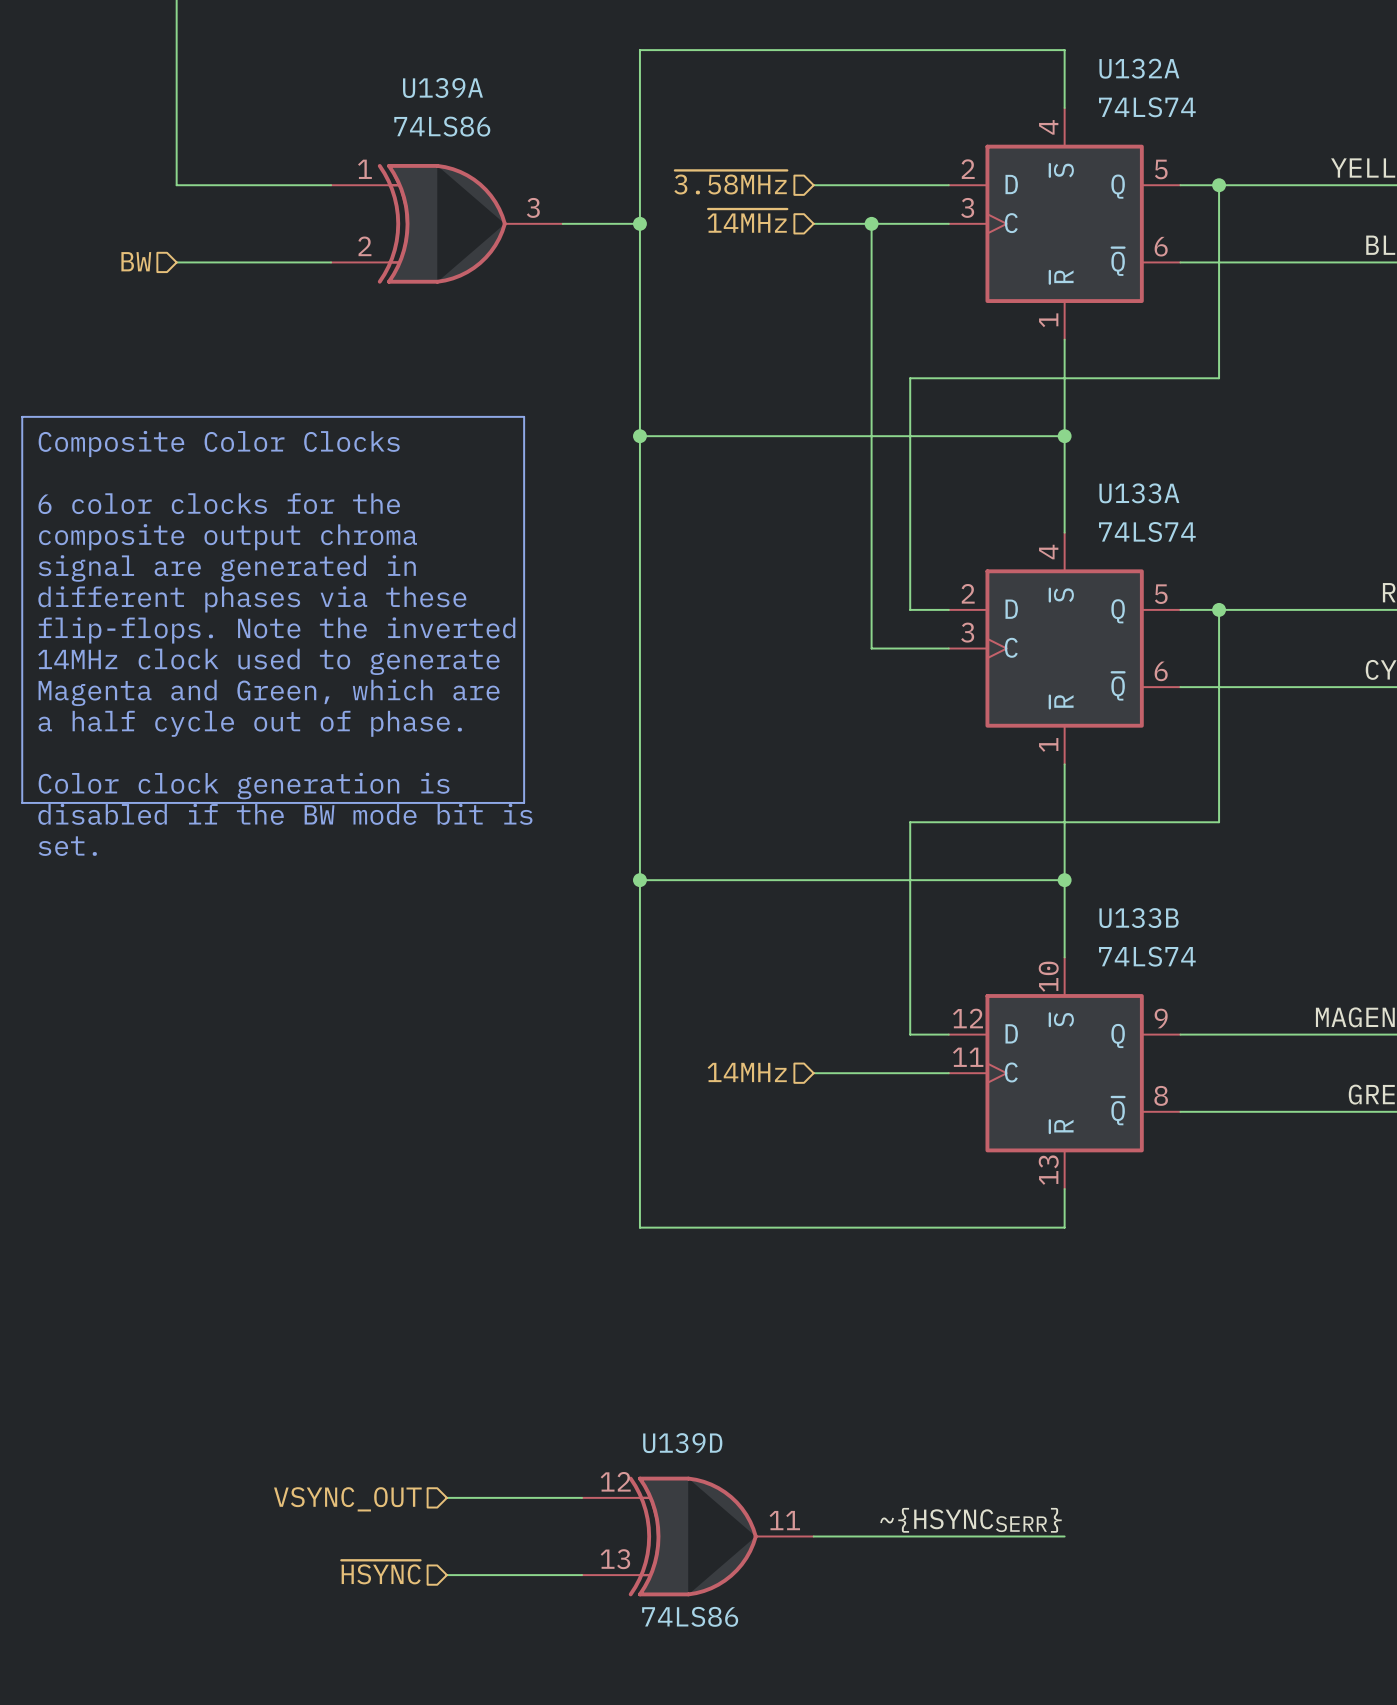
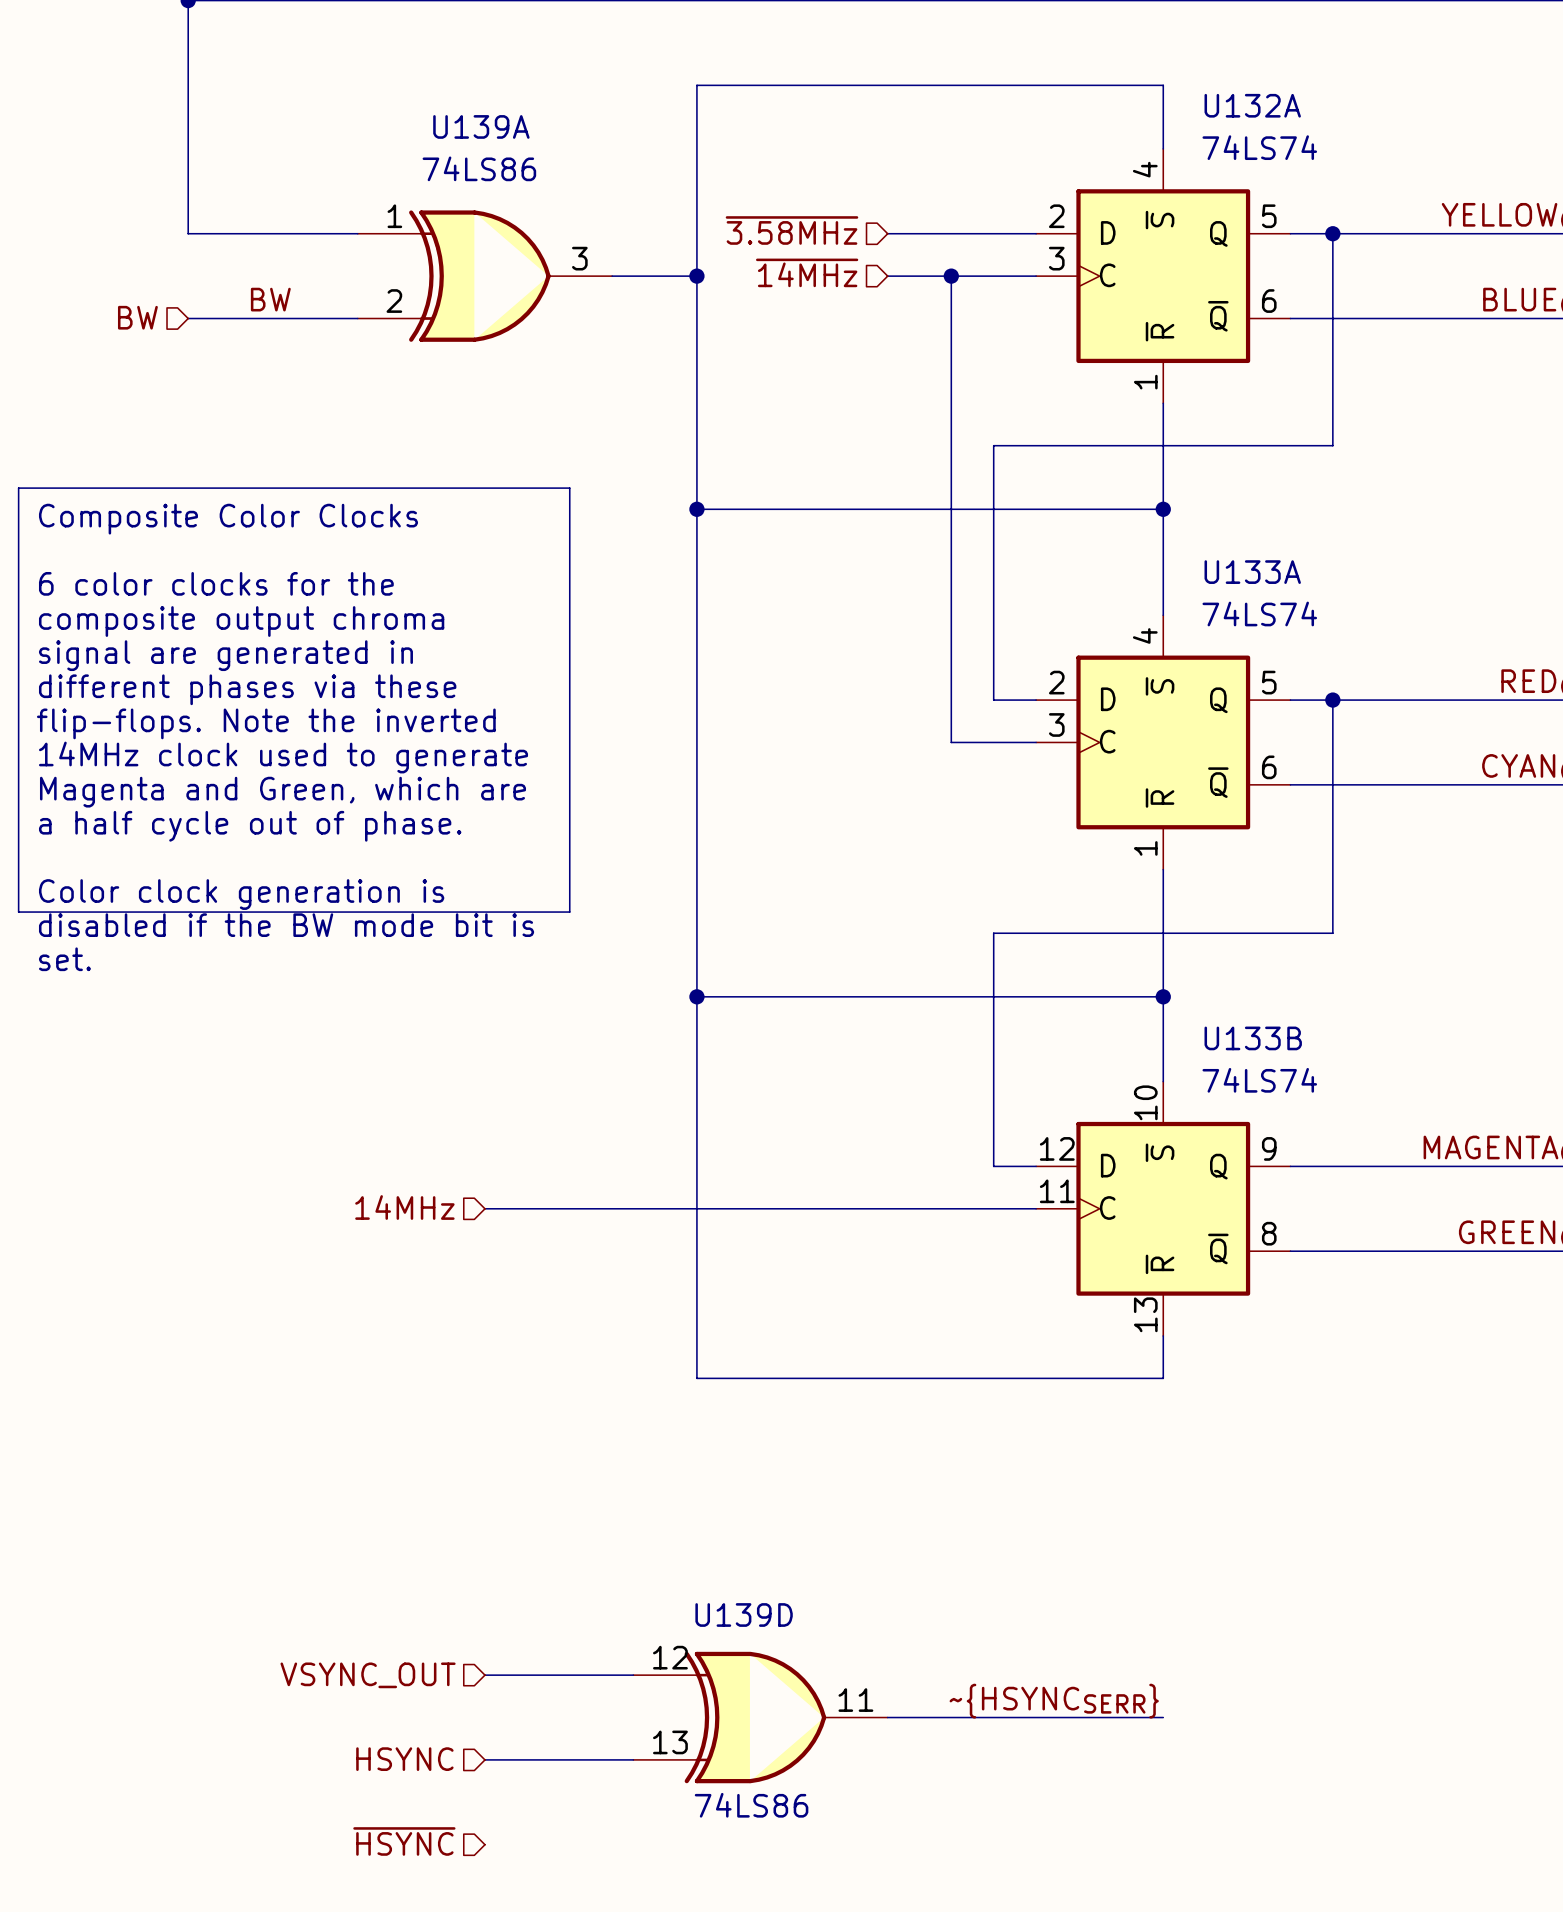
label: none -> BW (270, 299)
hierarchical label position: 14MHz (747, 1072) -> 14MHz (404, 1207)
wire: none -> (484, 1208) (887, 1208)
hierarchical label: ~{HSYNC} (381, 1572) -> HSYNC (404, 1759)
hierarchical label: none -> ~{HSYNC} (404, 1841)

